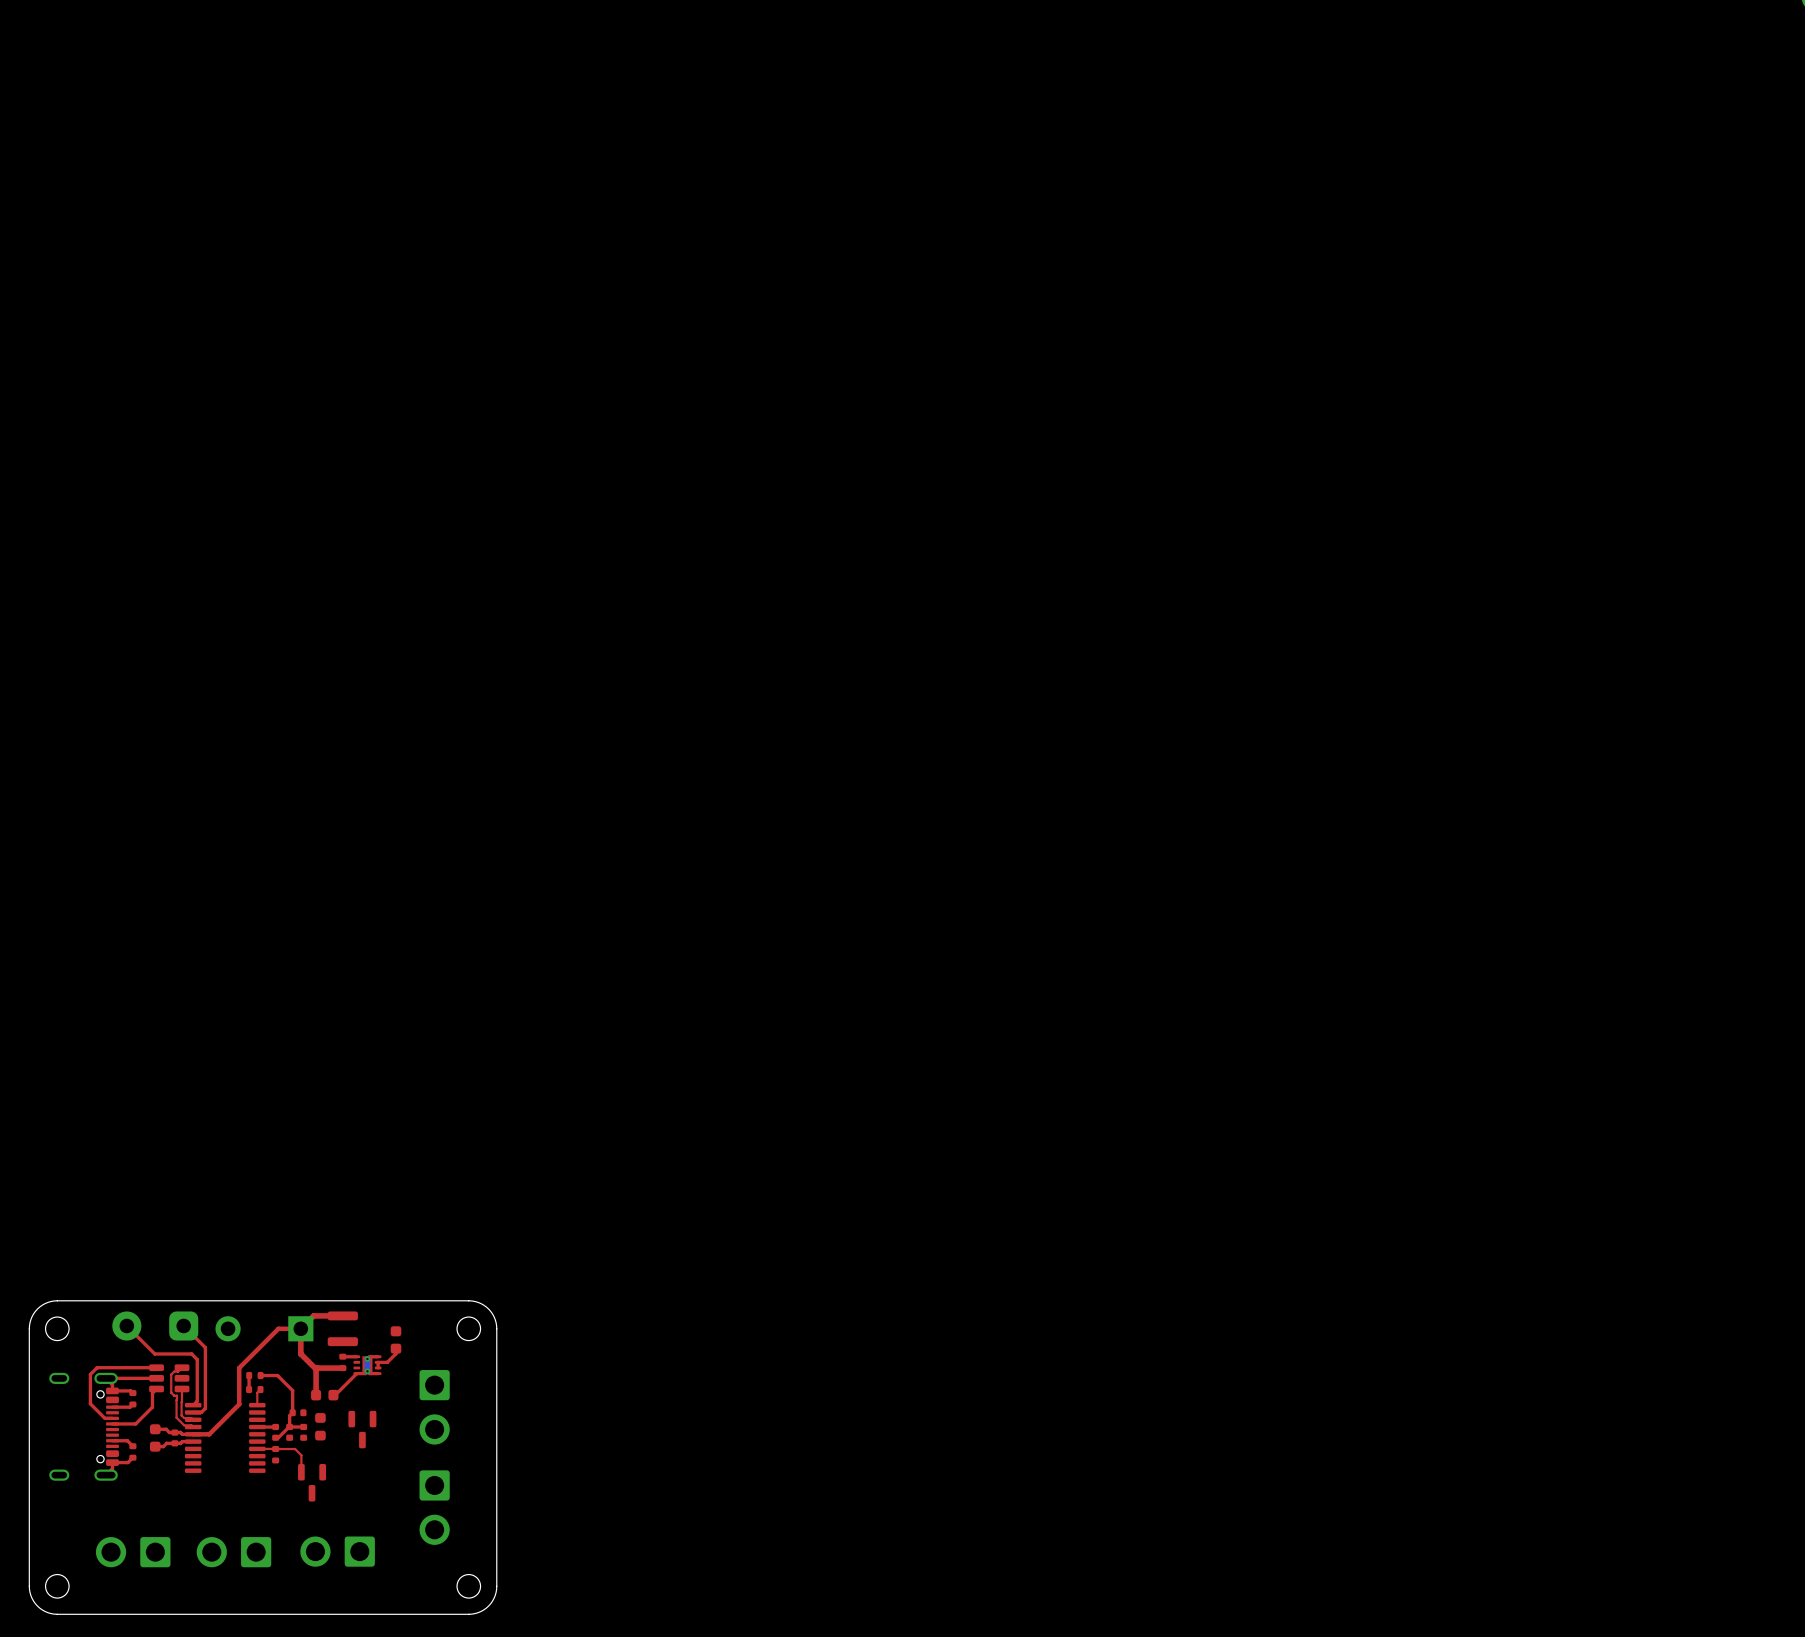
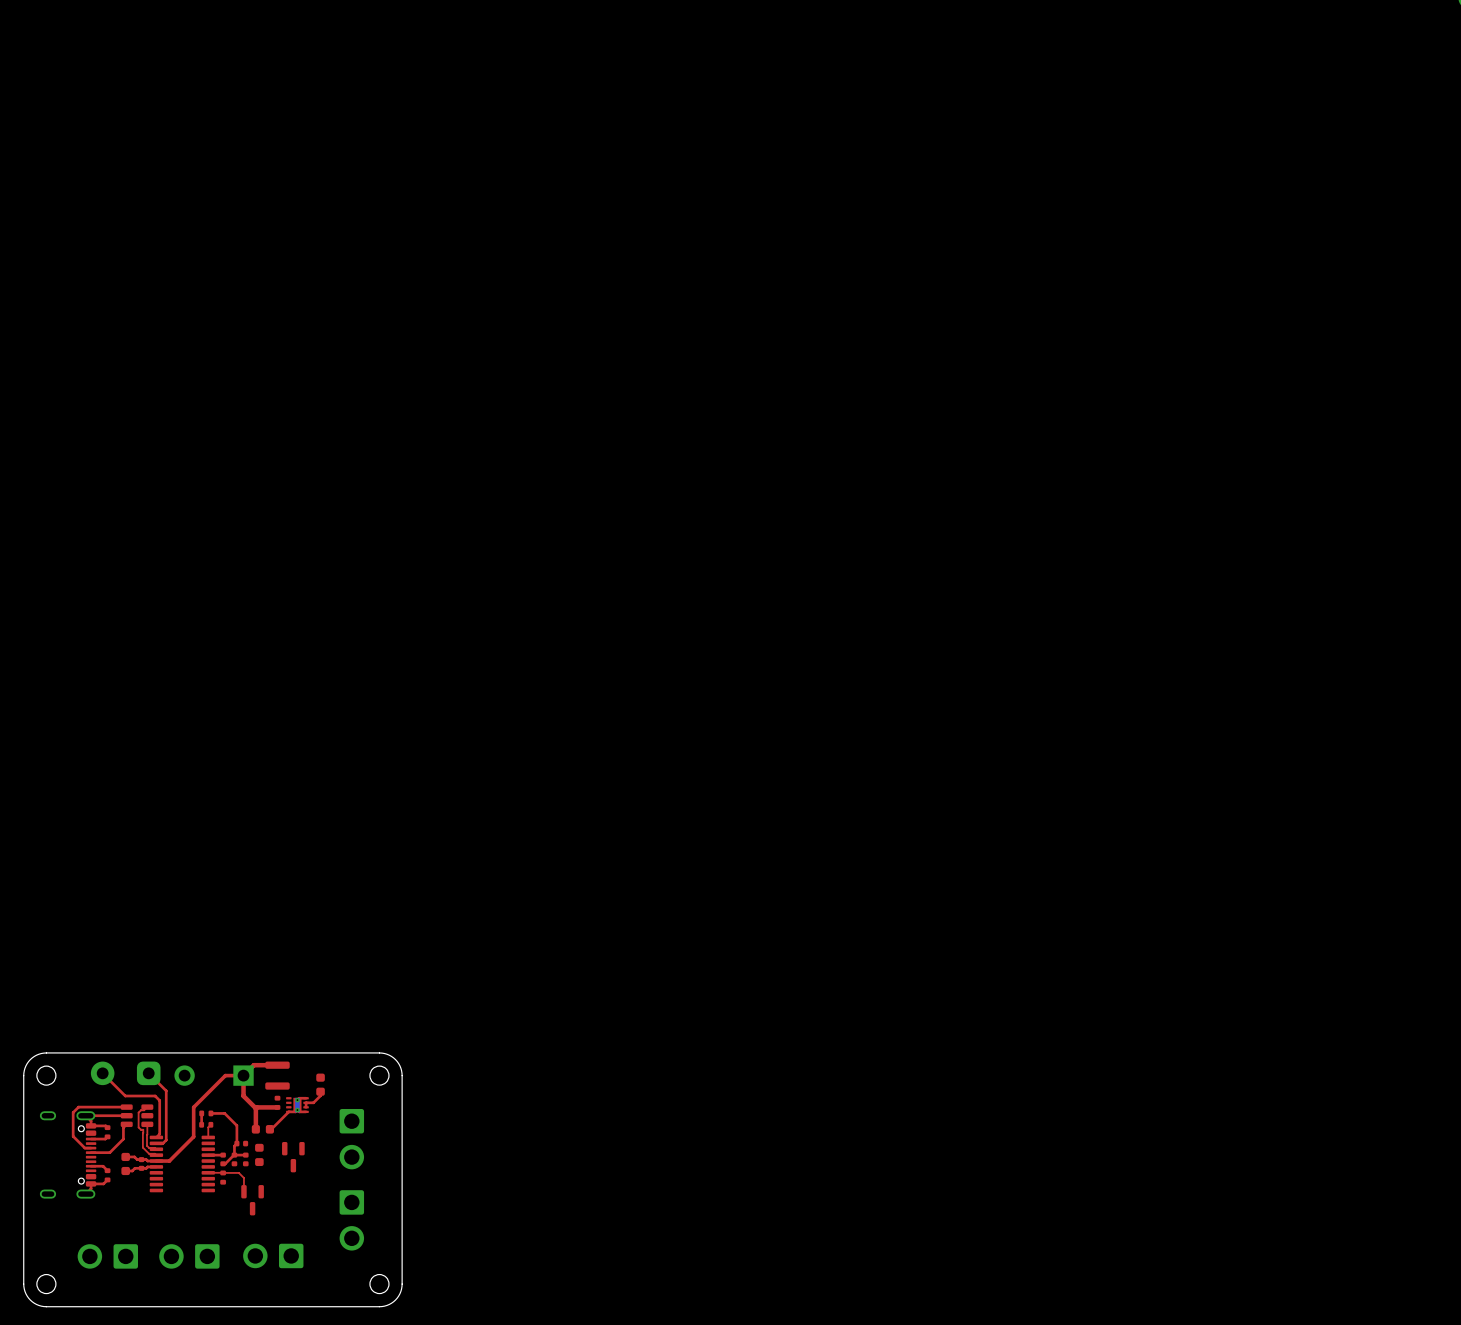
top track: (356, 1356) (342, 1356) -> none

